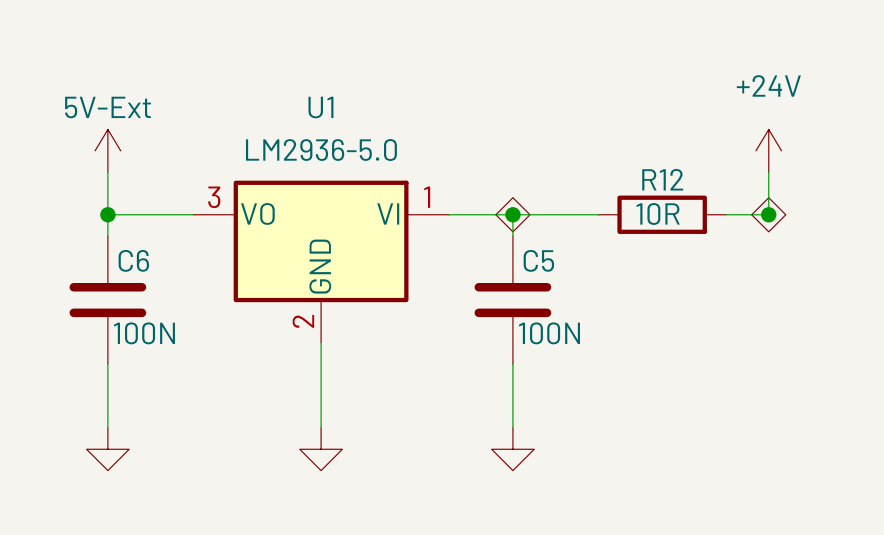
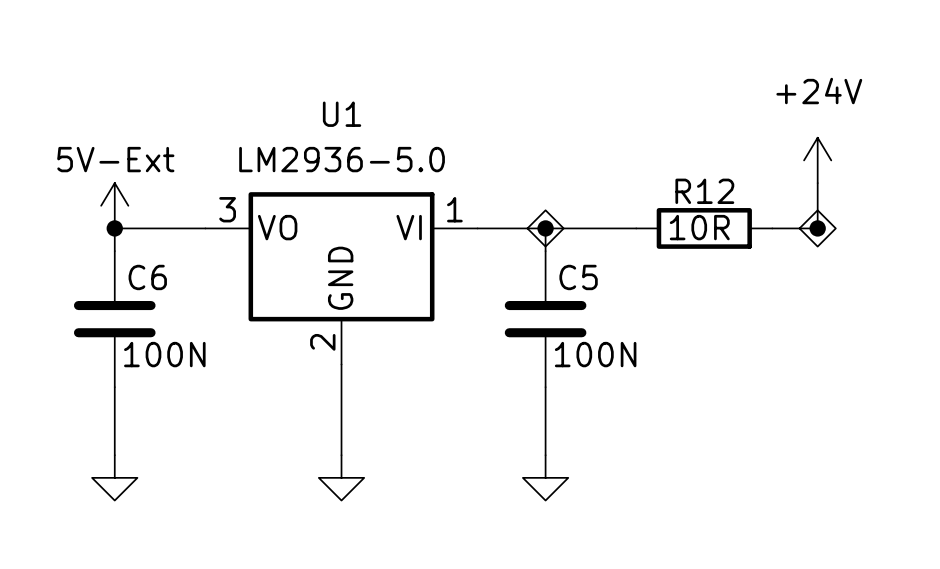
power symbol position: 5V-Ext (107, 150) -> 5V-Ext (114, 205)

